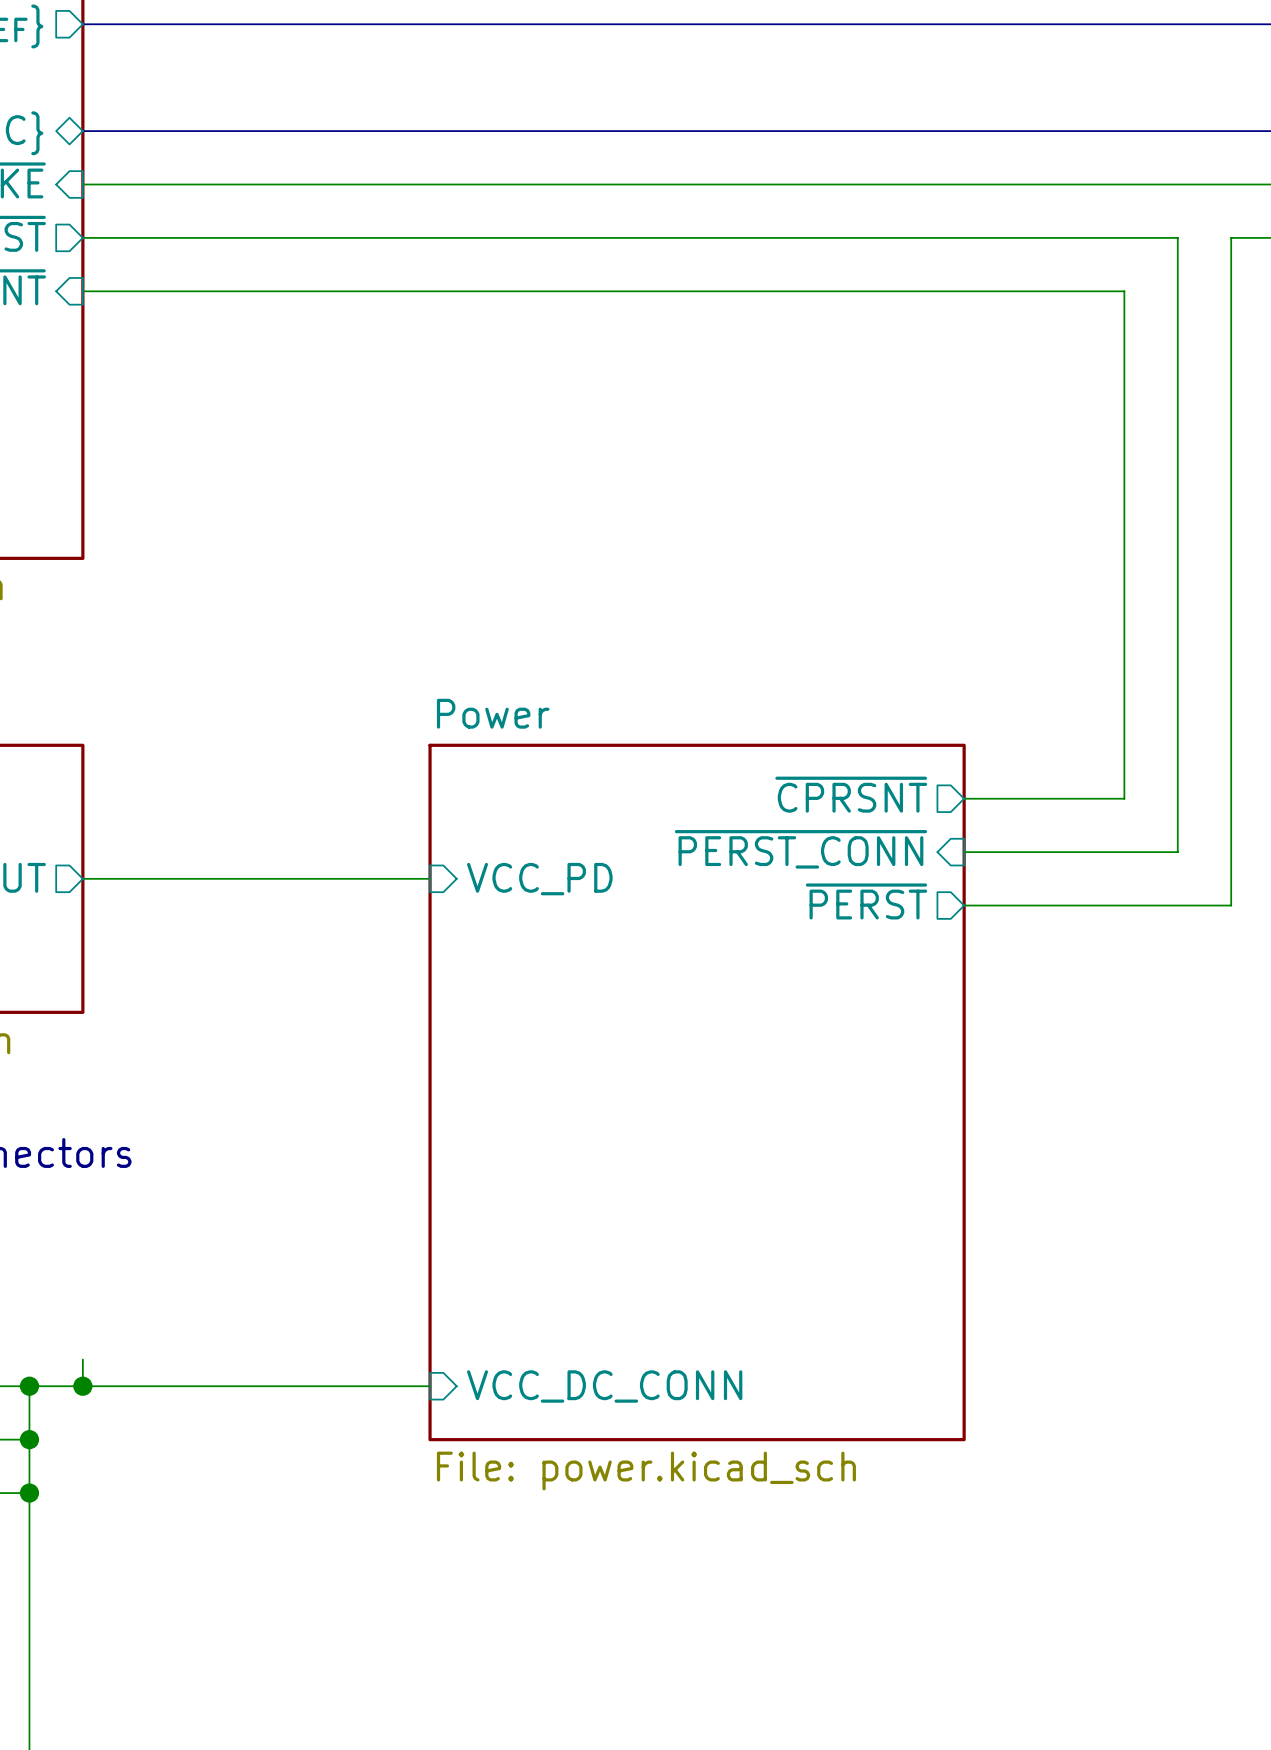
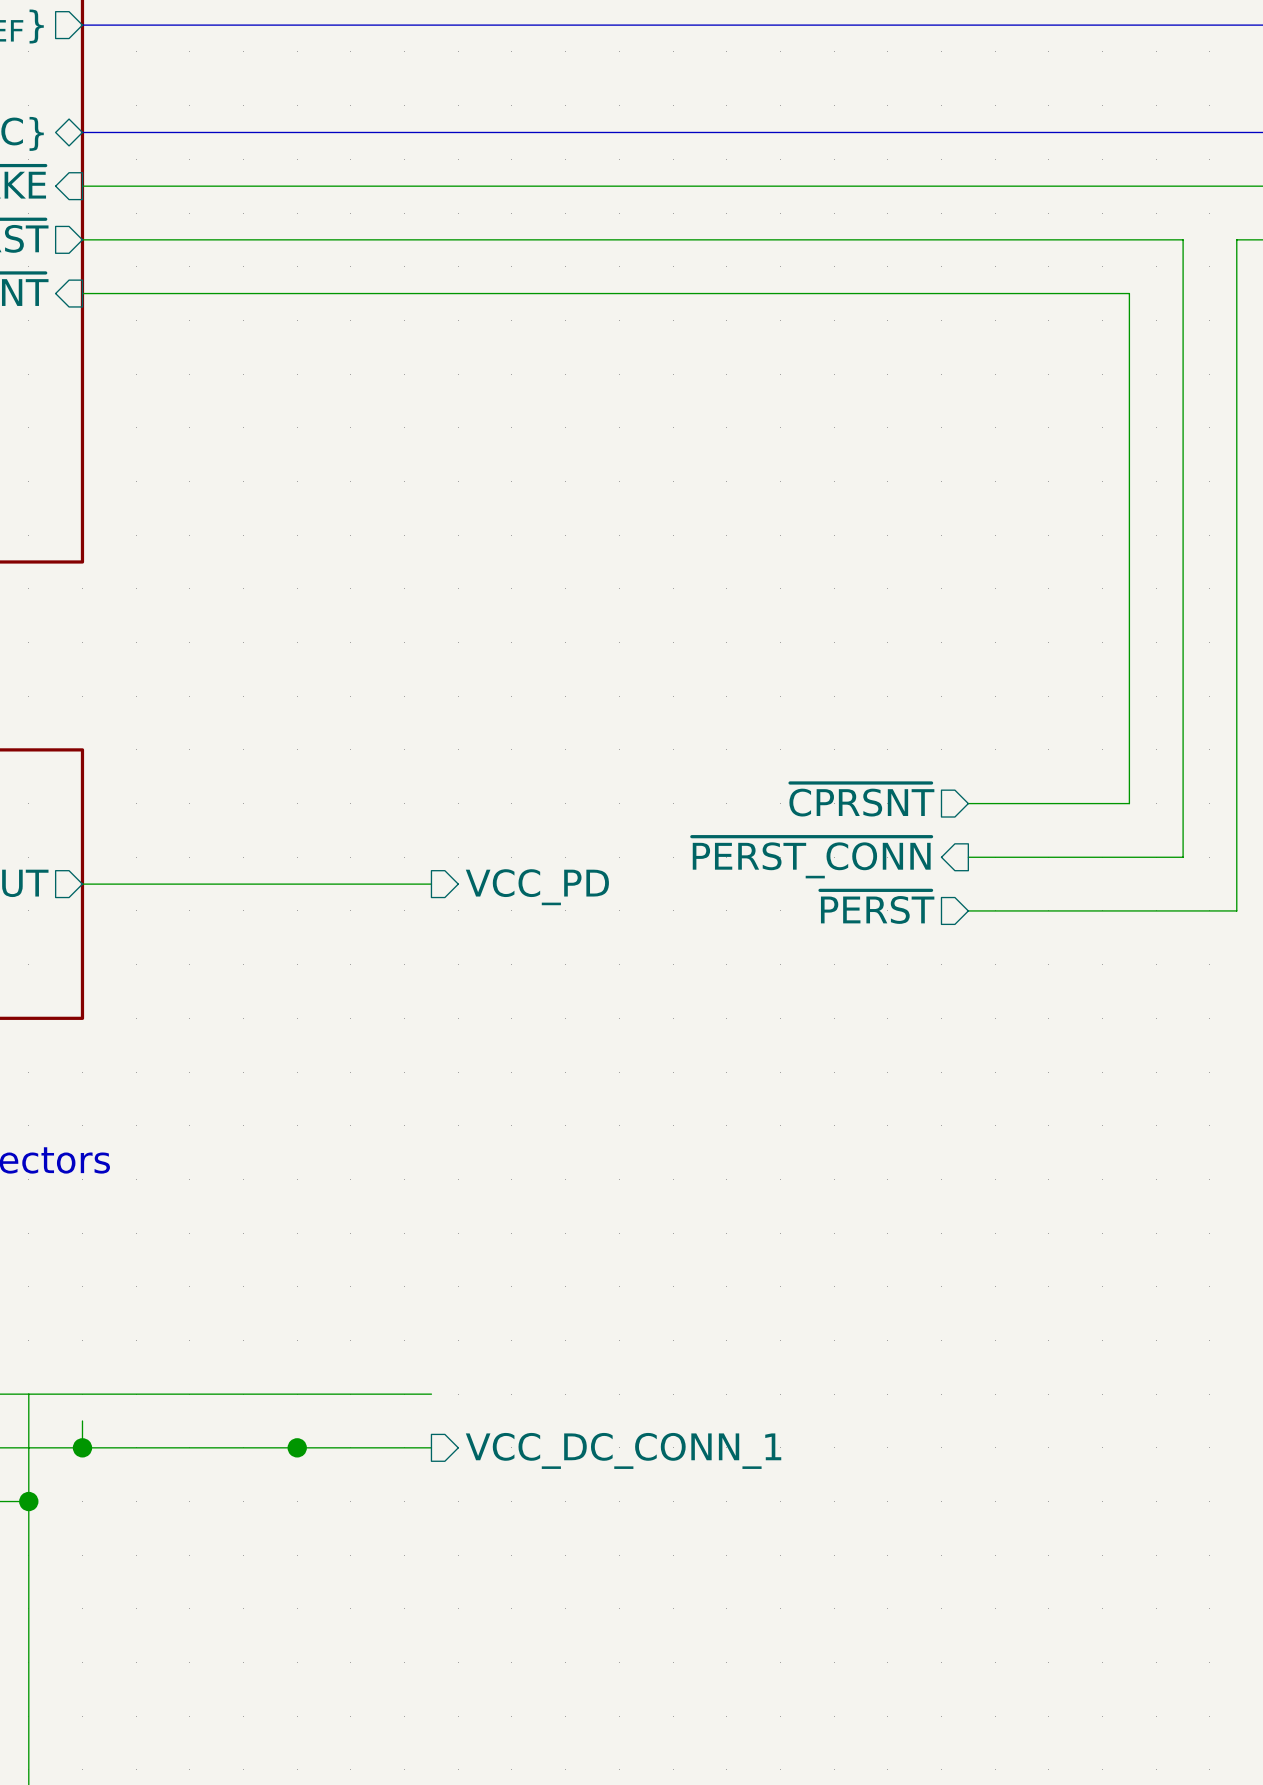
sheet Power: File: power.kicad_sch (697, 1092) -> none
wire: (82, 1359) (82, 1386) -> (82, 1420) (82, 1447)
junction: (29, 1386) -> none
junction: (82, 1386) -> none
sheet pin: VCC_DC_CONN (604, 1386) -> VCC_DC_CONN_1 (623, 1450)
wire: none -> (28, 1447) (431, 1447)
junction: (29, 1439) -> none
junction: none -> (82, 1447)
junction: none -> (297, 1447)

